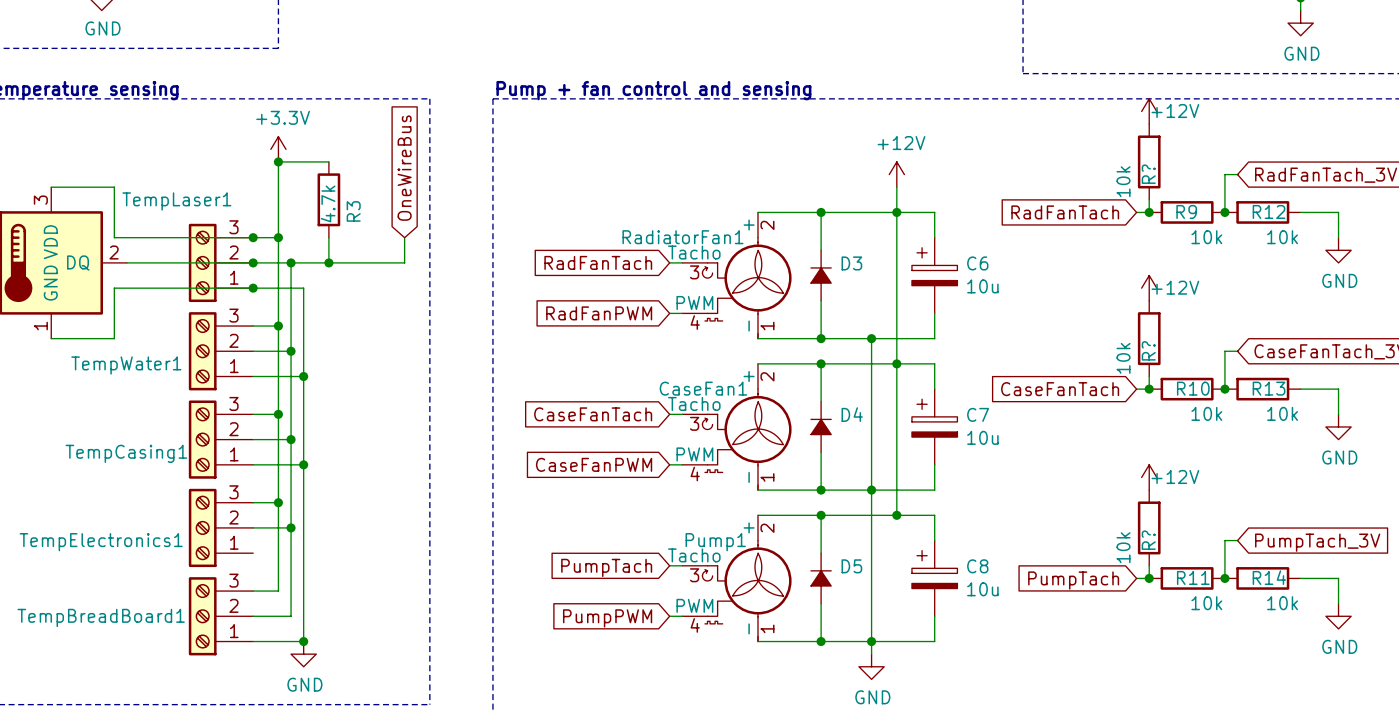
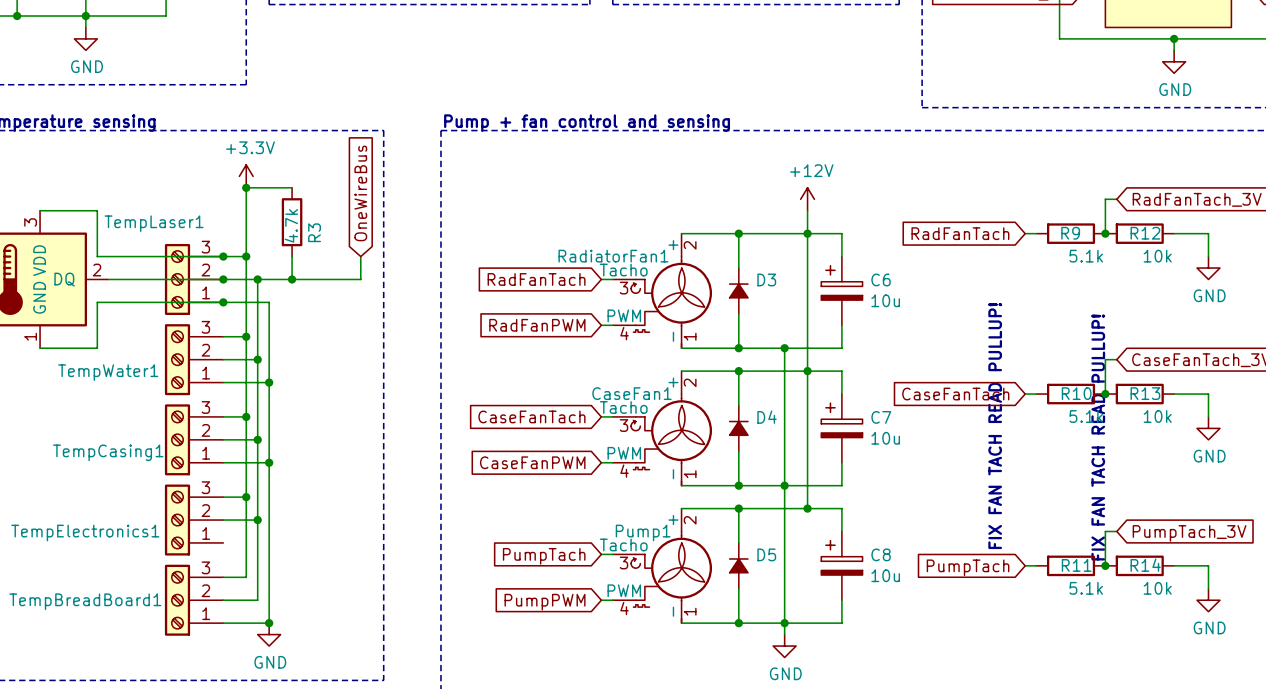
power symbol: +12V (1149, 111) -> none
R?: 10k (1149, 161) -> none
wire: (1149, 199) (1149, 212) -> none
junction: (1149, 212) -> none
R9 value: 10k (1206, 237) -> 5.1k (1086, 256)
power symbol: +12V (1149, 288) -> none
R?: 10k (1149, 338) -> none
wire: (1149, 376) (1149, 389) -> none
junction: (1149, 389) -> none
R10 value: 10k (1206, 413) -> 5.1k (1086, 416)
text: none -> FIX FAN TACH READ PULLUP! (995, 426)
text: none -> FIX FAN TACH READ PULLUP! (1098, 437)
power symbol: +12V (1149, 477) -> none
R?: 10k (1149, 527) -> none
wire: (1149, 565) (1149, 578) -> none
junction: (1149, 578) -> none
R11 value: 10k (1206, 603) -> 5.1k (1086, 588)

